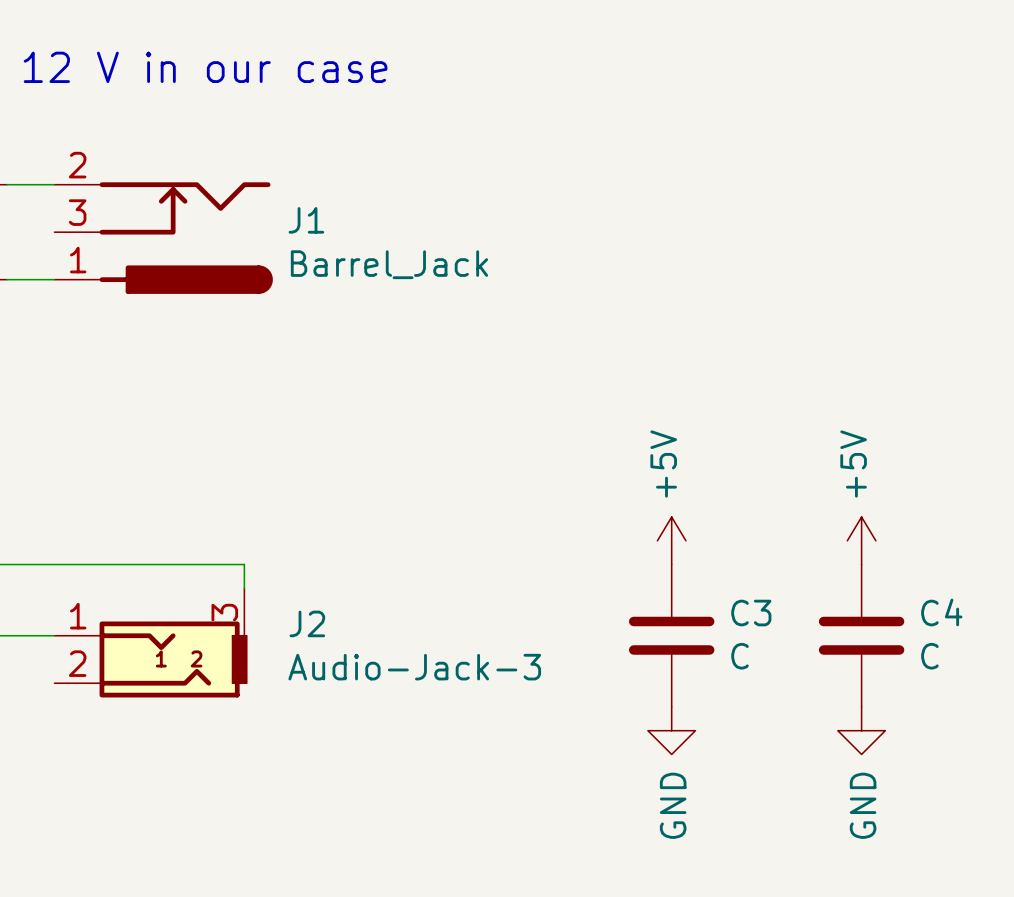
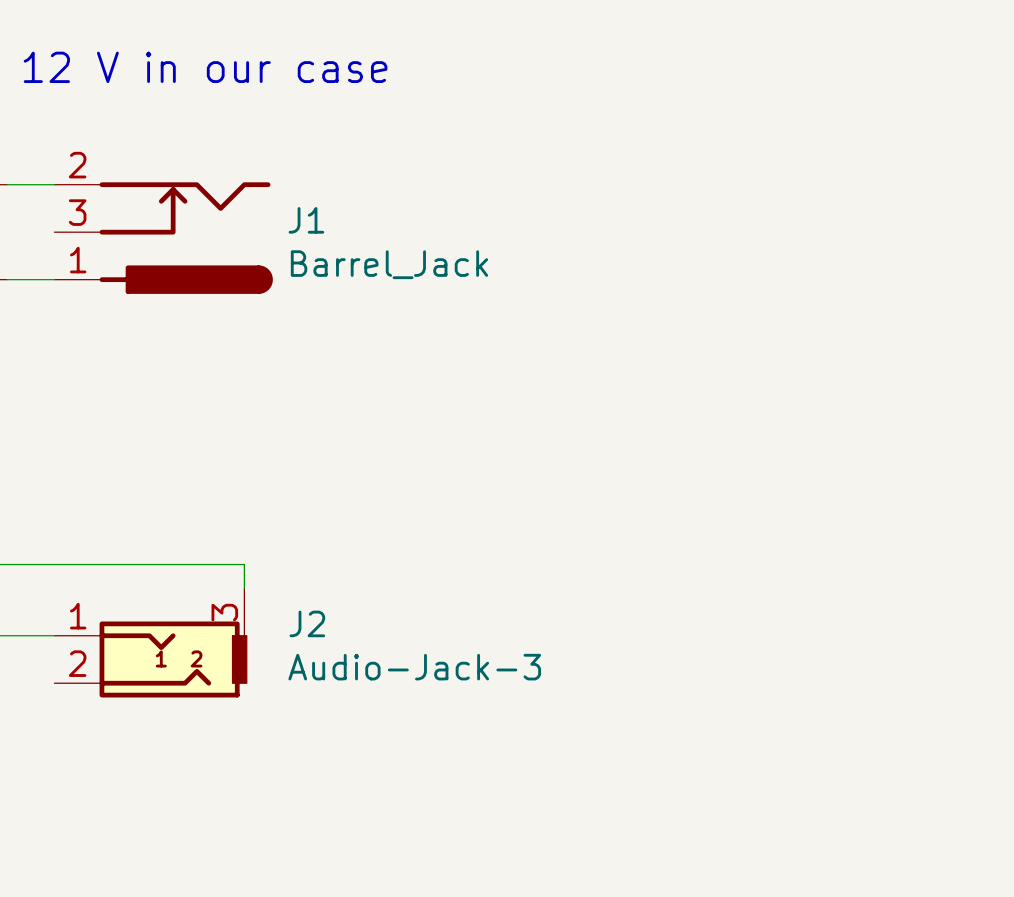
power symbol: +5V (671, 540) -> none
power symbol: +5V (861, 540) -> none
C3: C (671, 635) -> none
C4: C (861, 635) -> none
power symbol: GND (671, 730) -> none
power symbol: GND (861, 730) -> none

